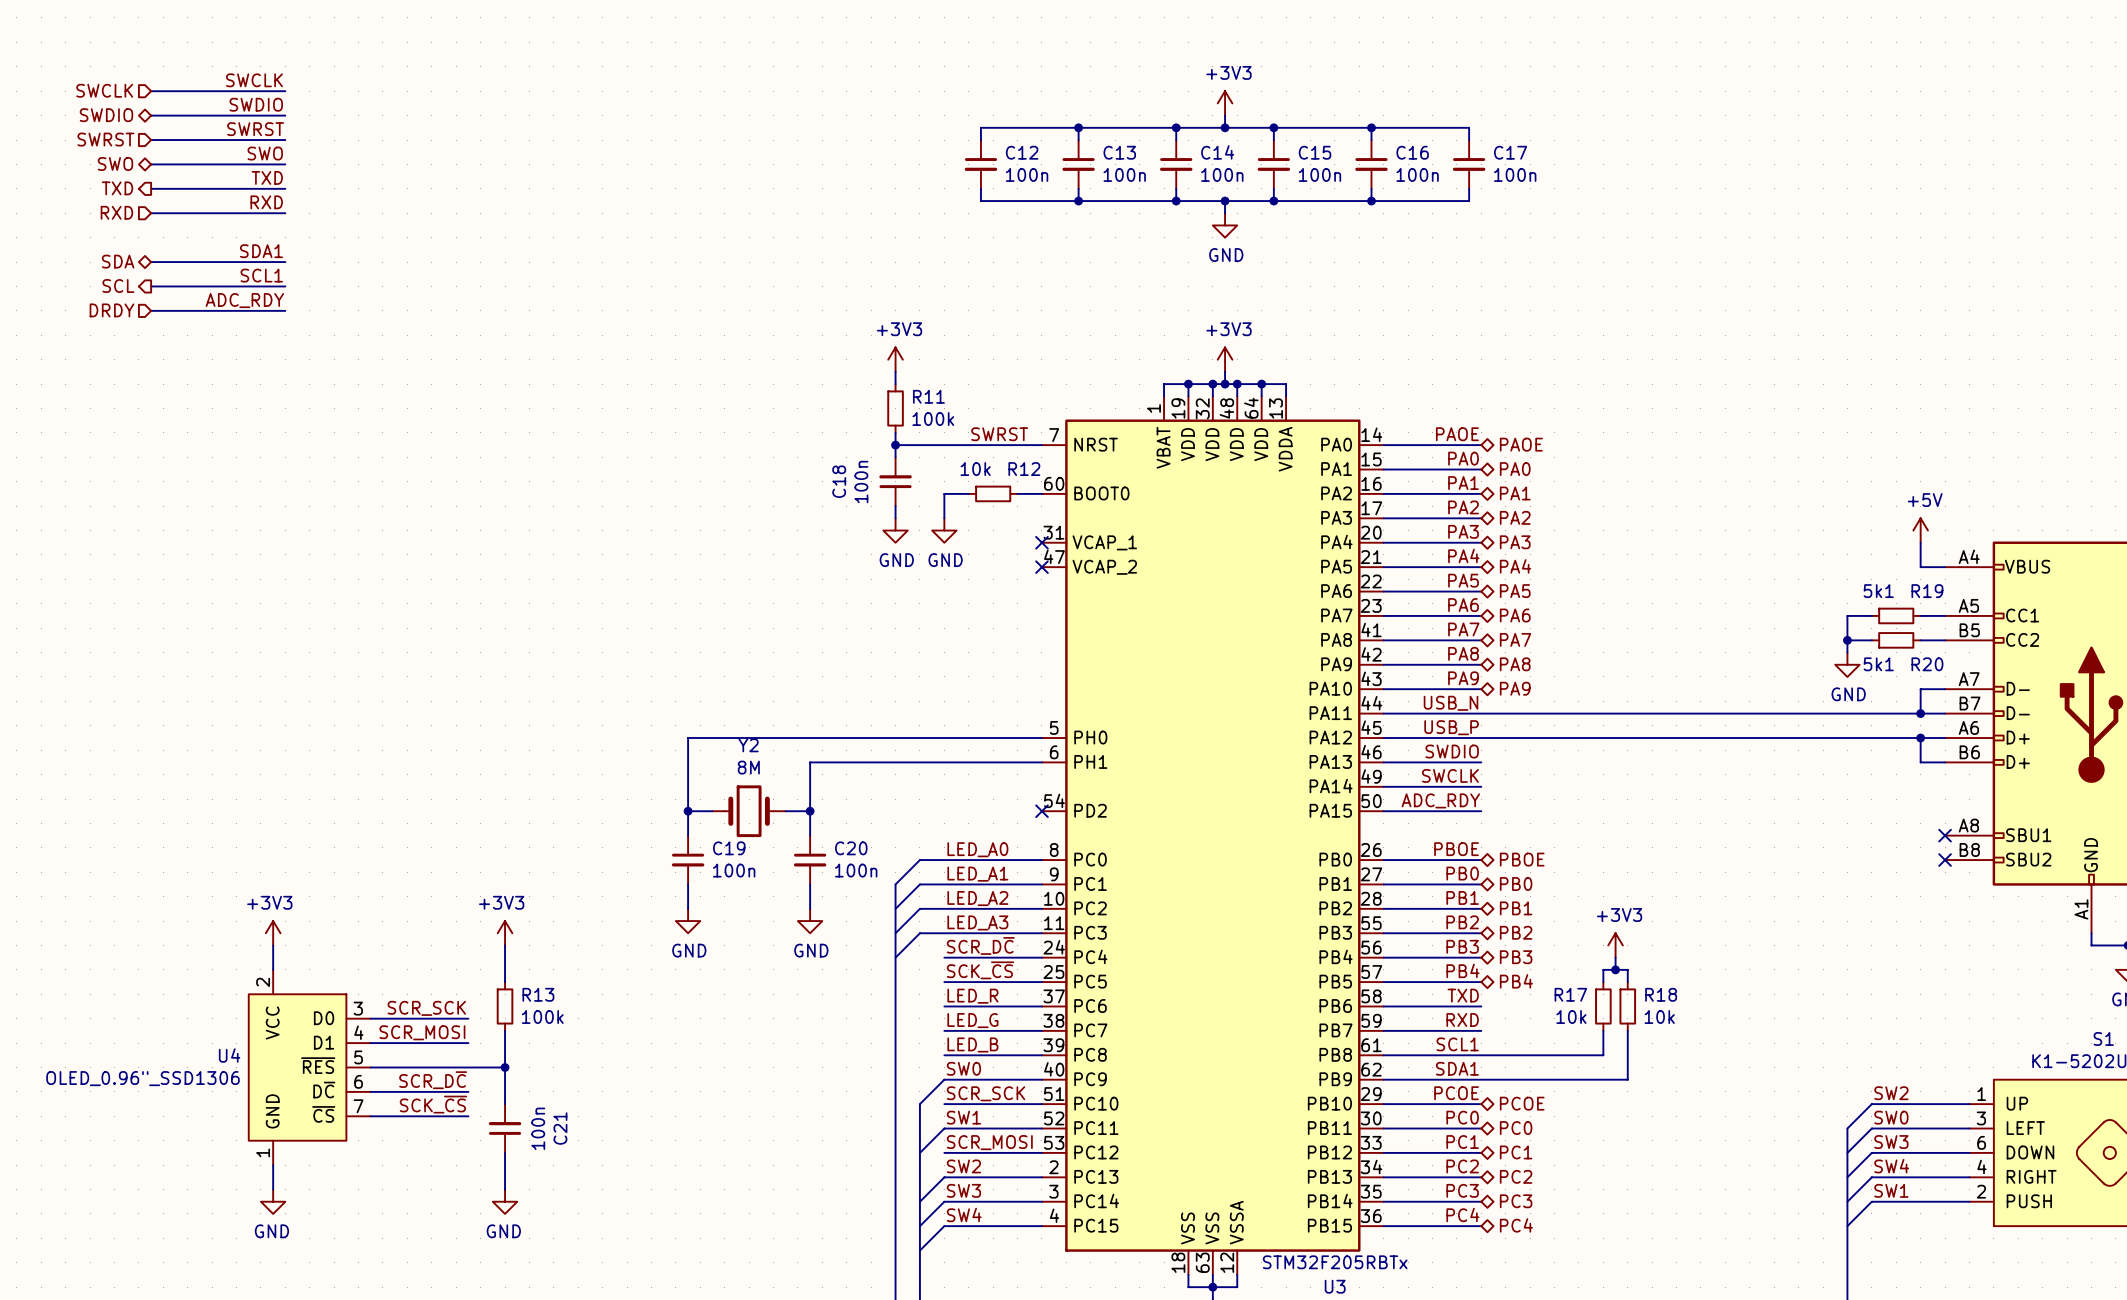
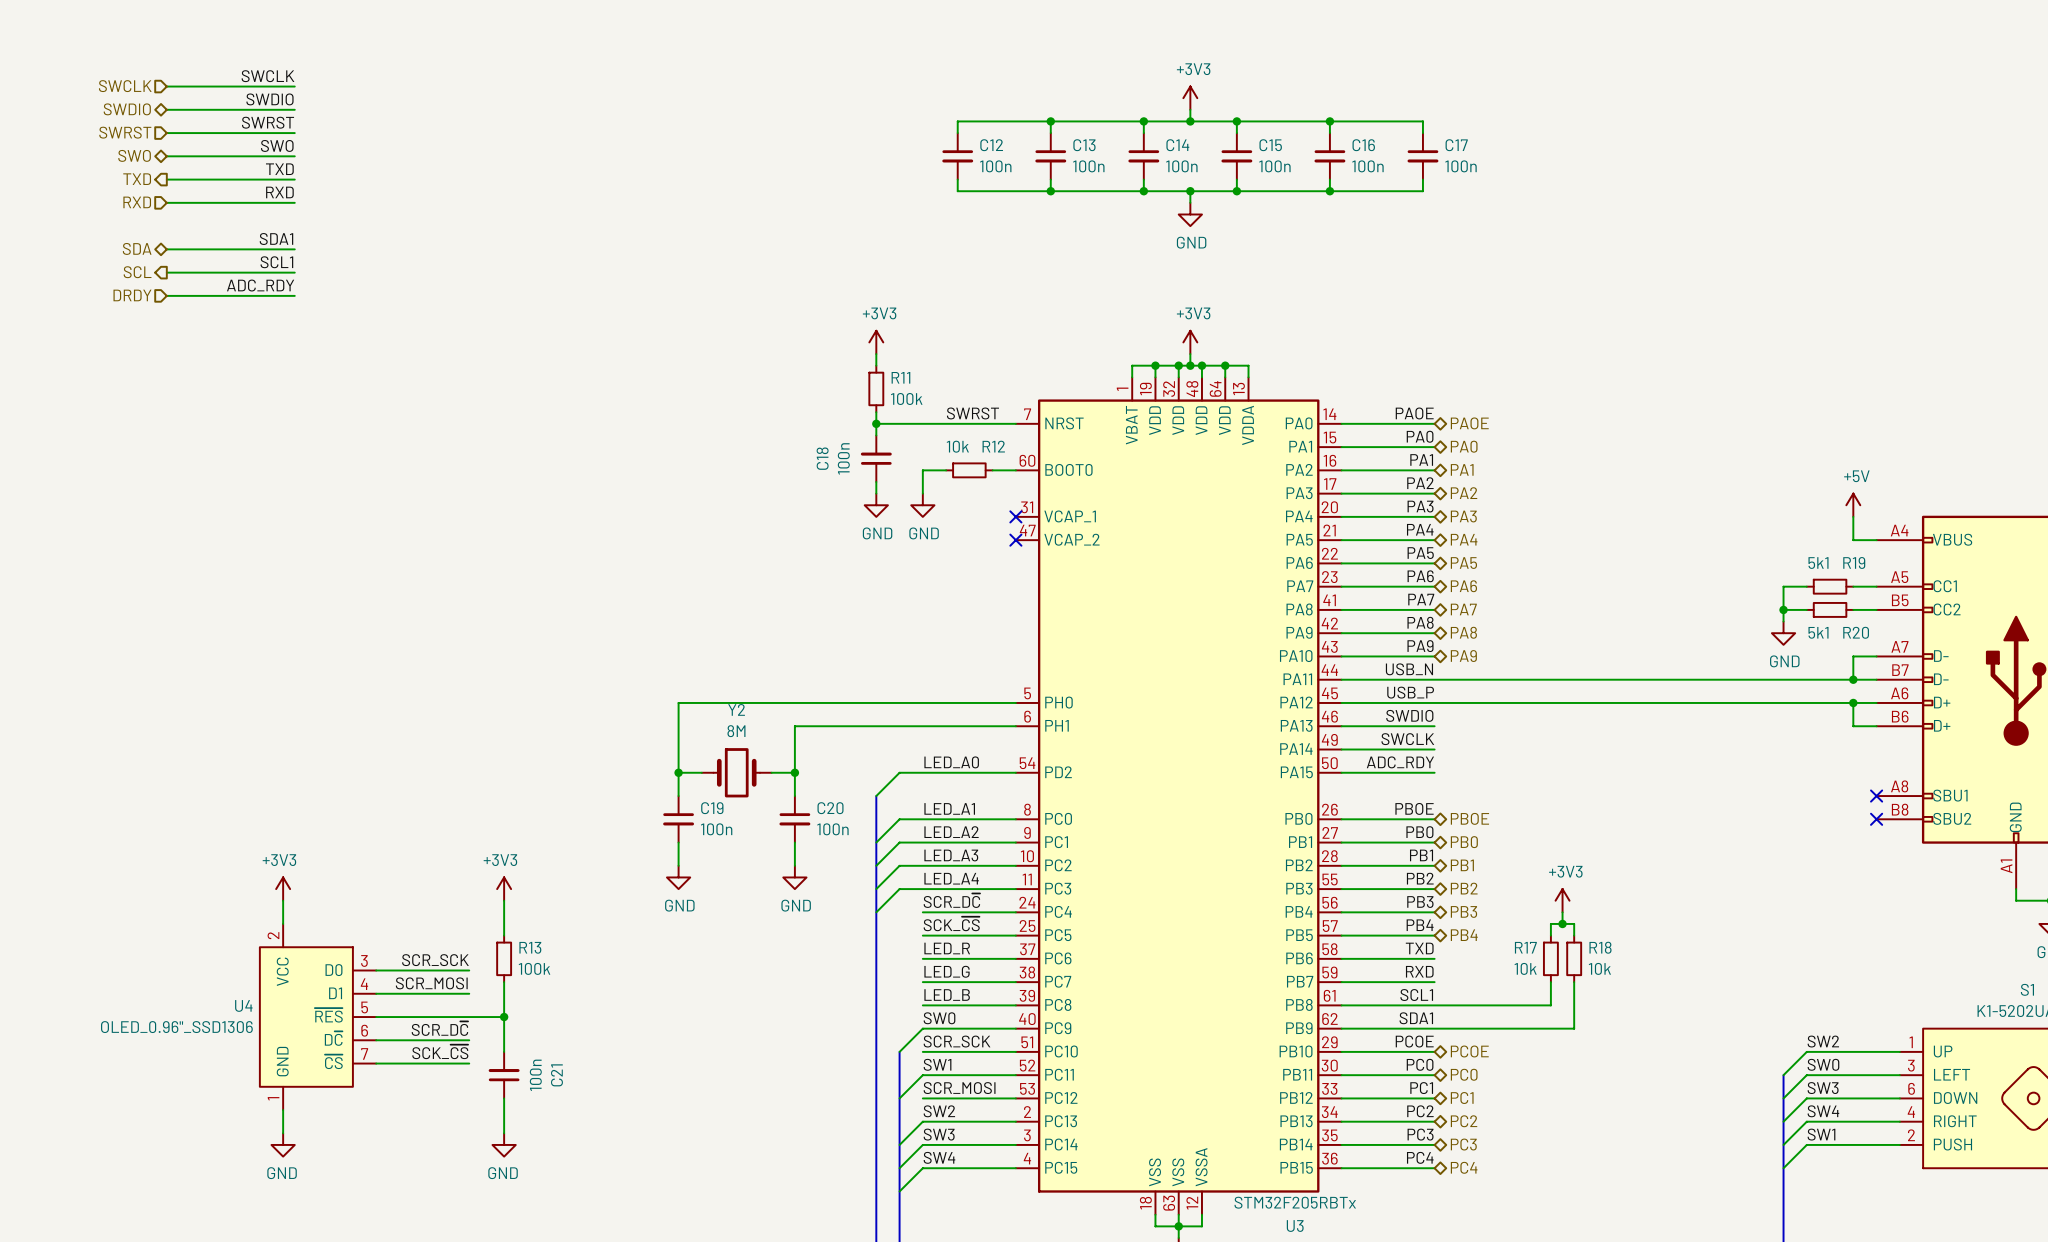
label: none -> LED_A0 (951, 762)
wire: none -> (1015, 772) (899, 772) (876, 796)
no-connect mark: (1041, 811) -> none
bus: none -> (876, 796) (876, 842)
label: LED_A0 (977, 849) -> LED_A1 (949, 808)
label: LED_A1 (977, 874) -> LED_A2 (951, 832)
label: LED_A2 (977, 898) -> LED_A3 (951, 855)
label: LED_A3 (977, 922) -> LED_A4 (951, 878)

